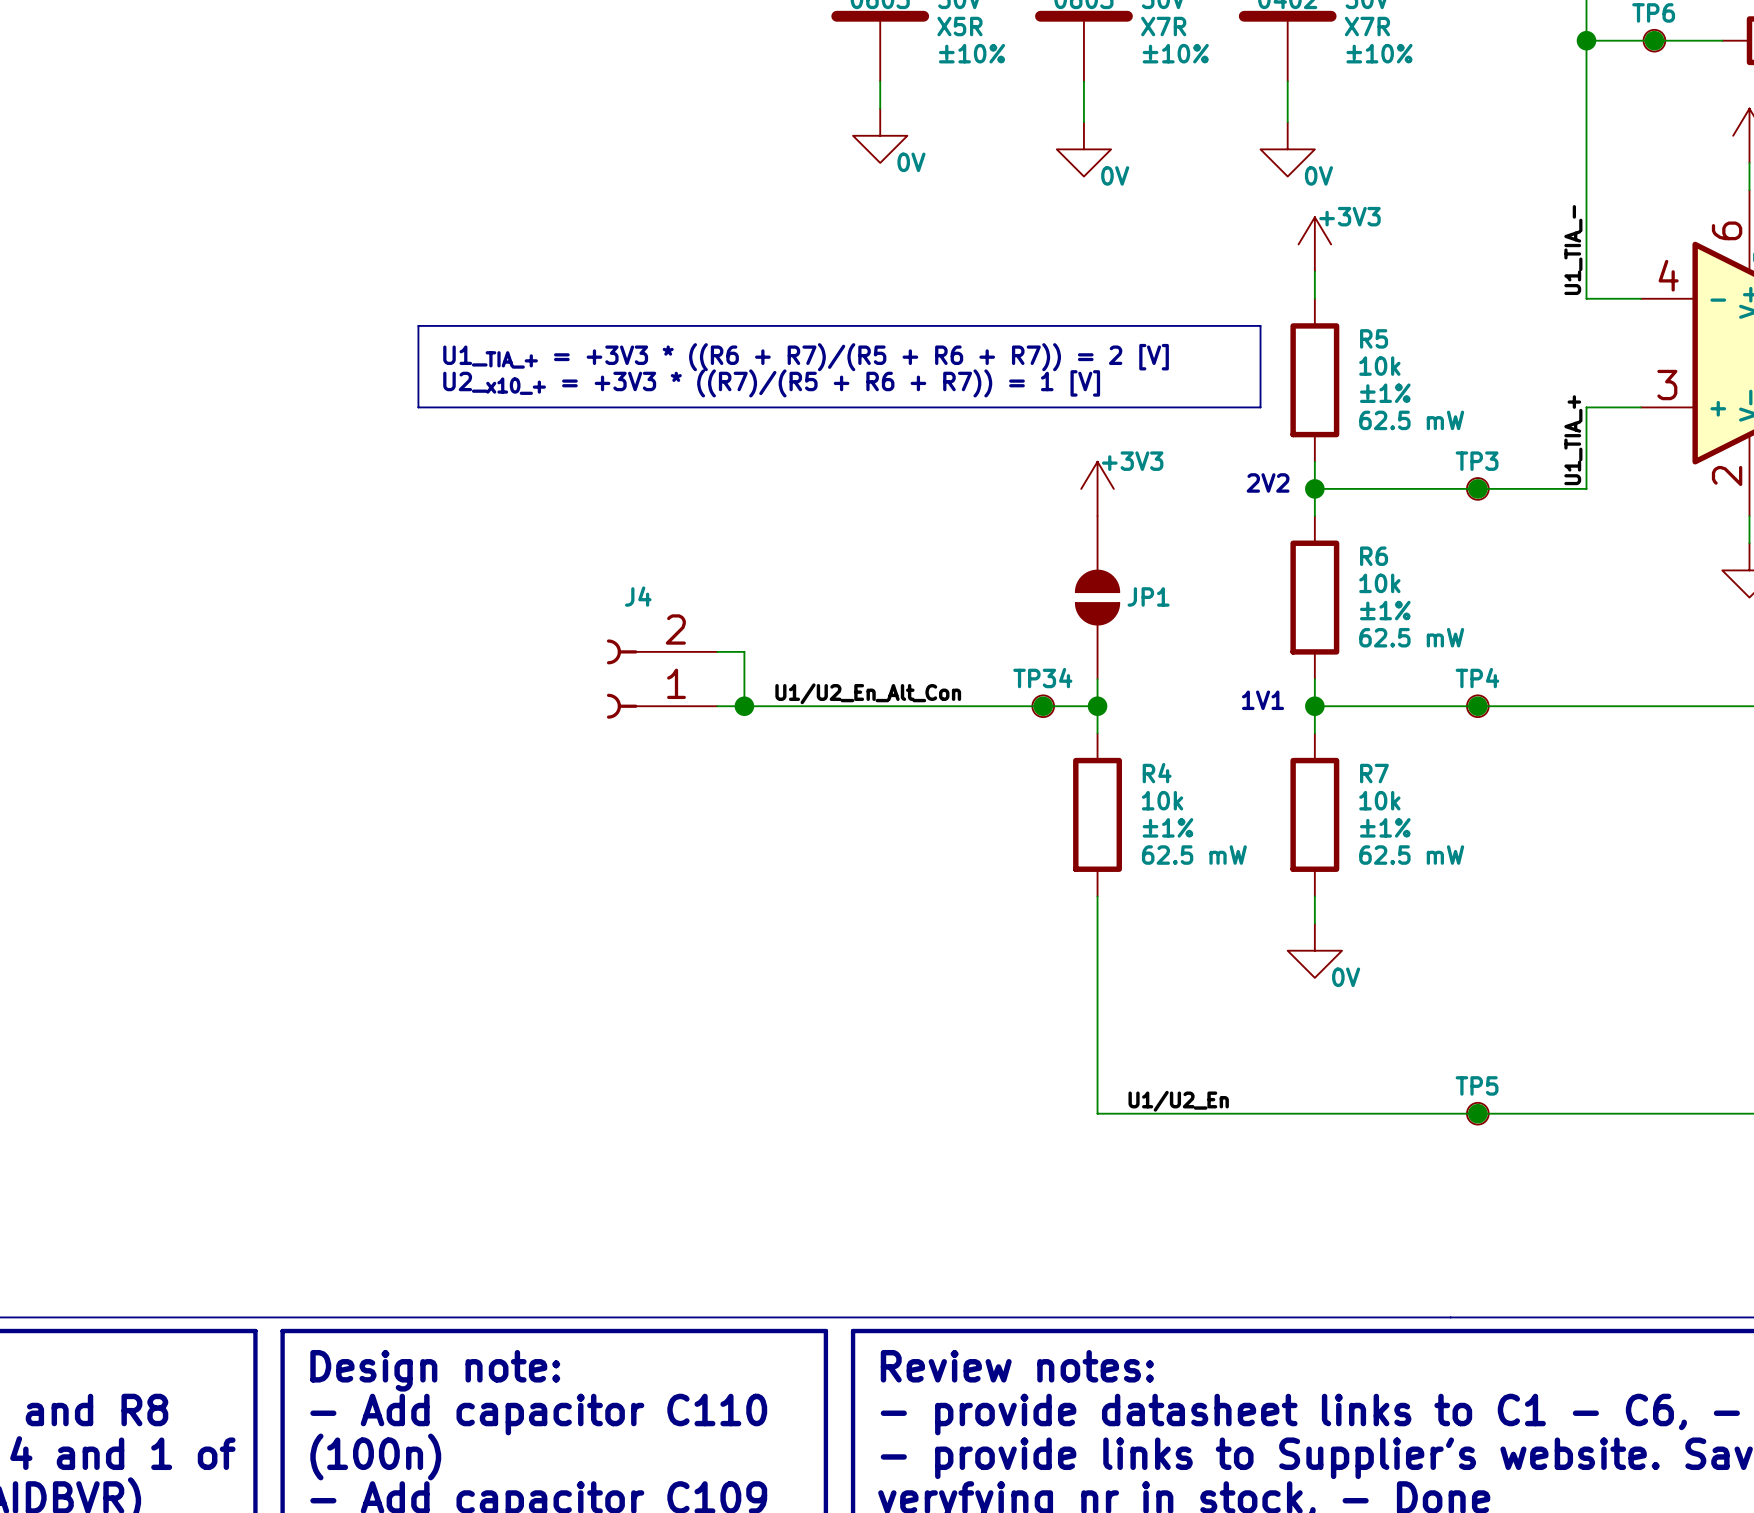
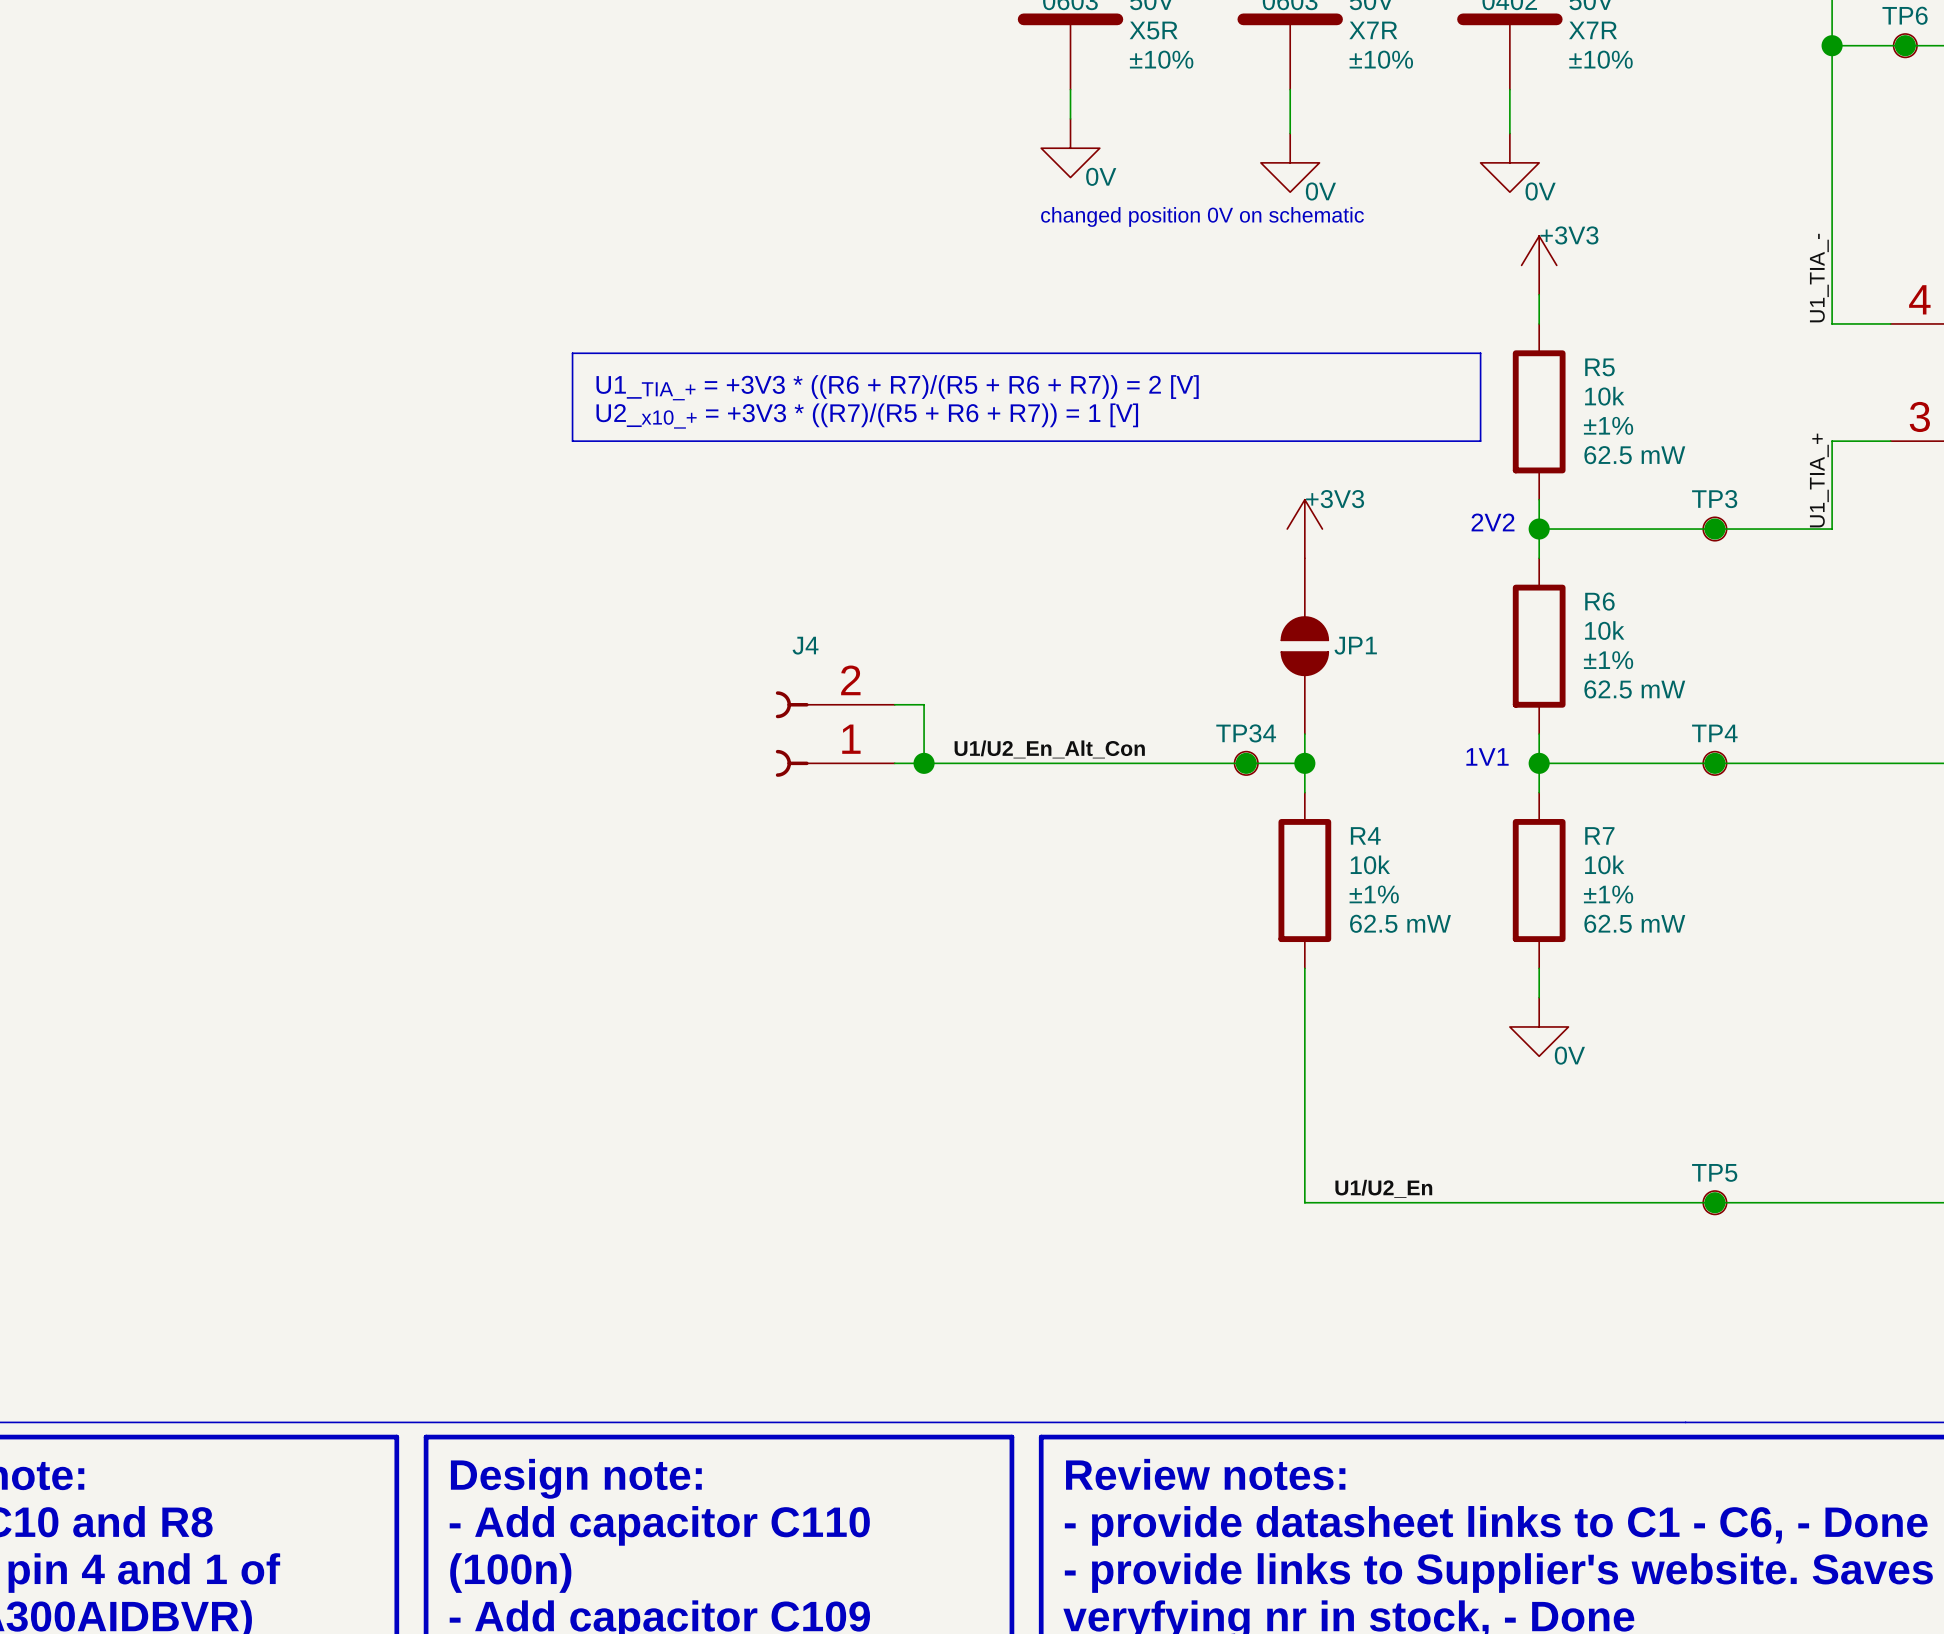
text: none -> changed position 0V on schematic (1202, 216)

